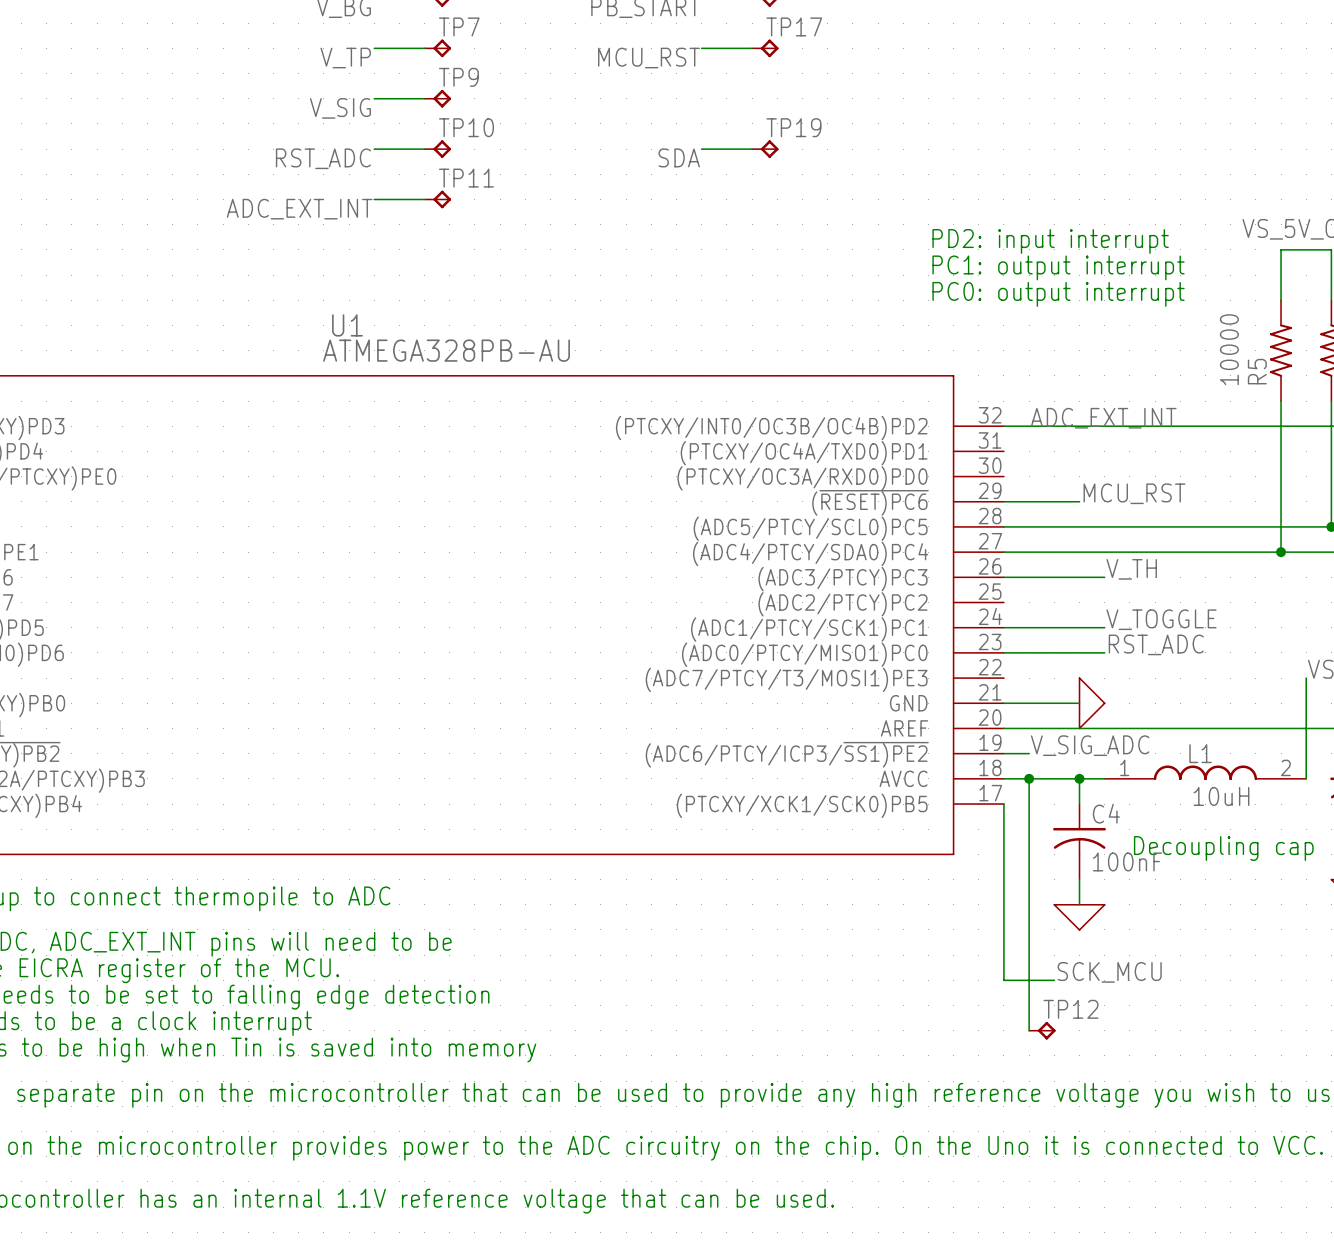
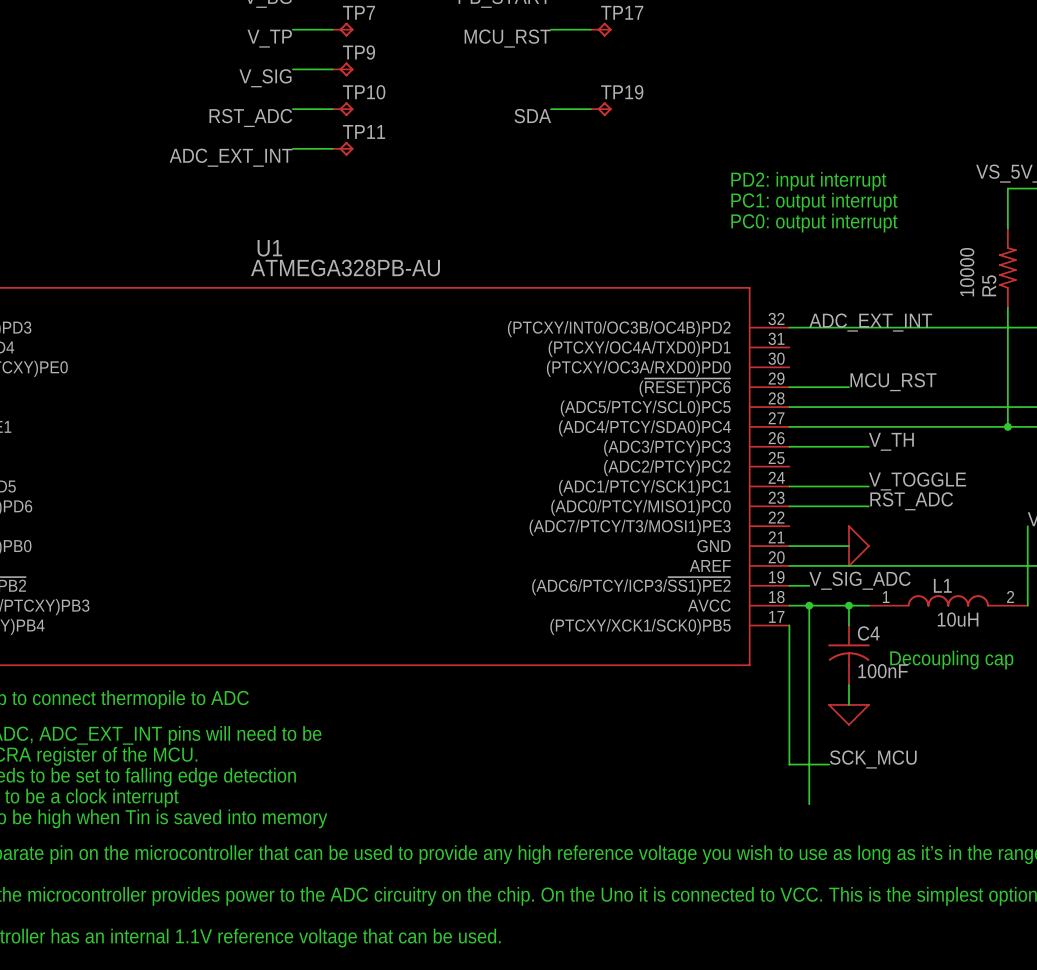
TP12: (1042, 1030) -> none

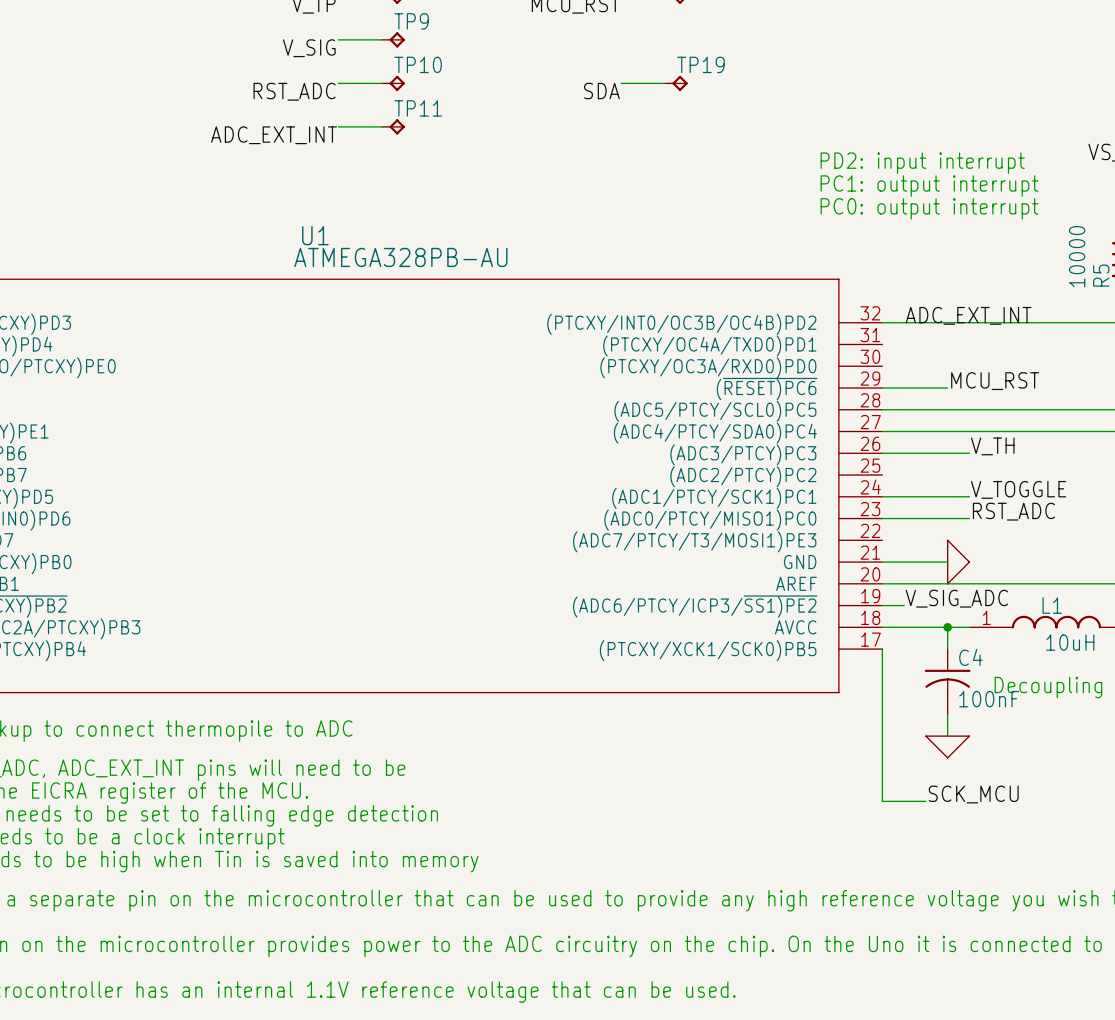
wire: (809, 605) (809, 804) -> none
junction: (809, 605) -> none

